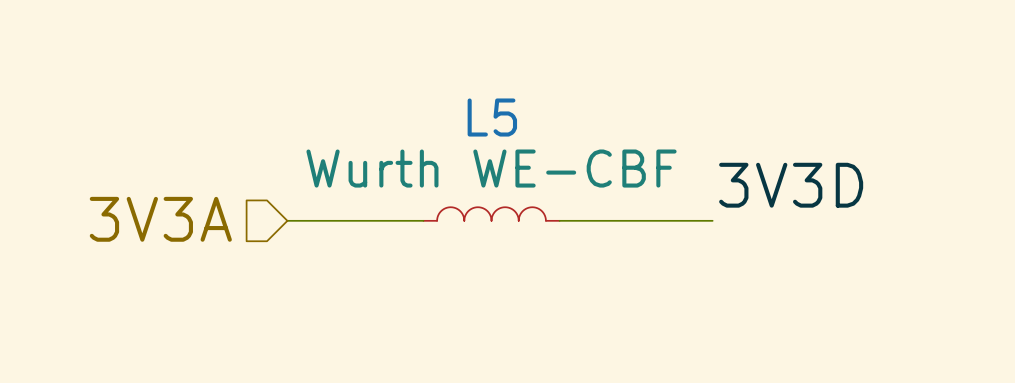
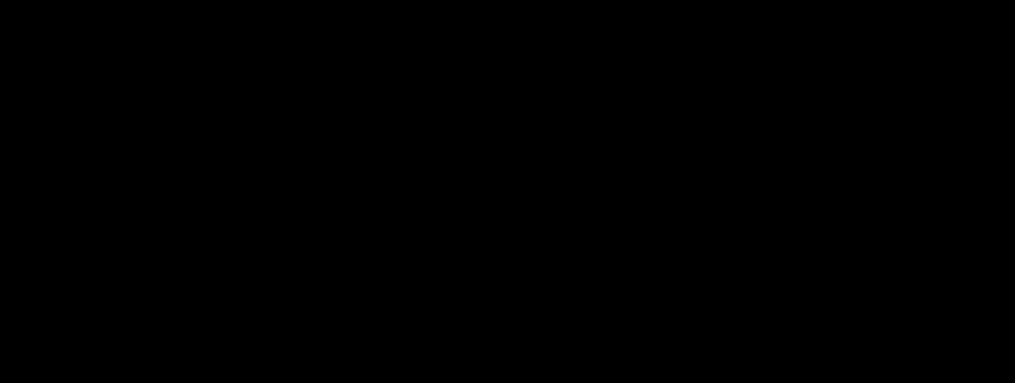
label: 3V3D (791, 185) -> none
L5: Wurth WE-CBF (491, 214) -> none
hierarchical label: 3V3A (160, 219) -> none
wire: (287, 220) (423, 220) -> none
wire: (559, 220) (712, 220) -> none

